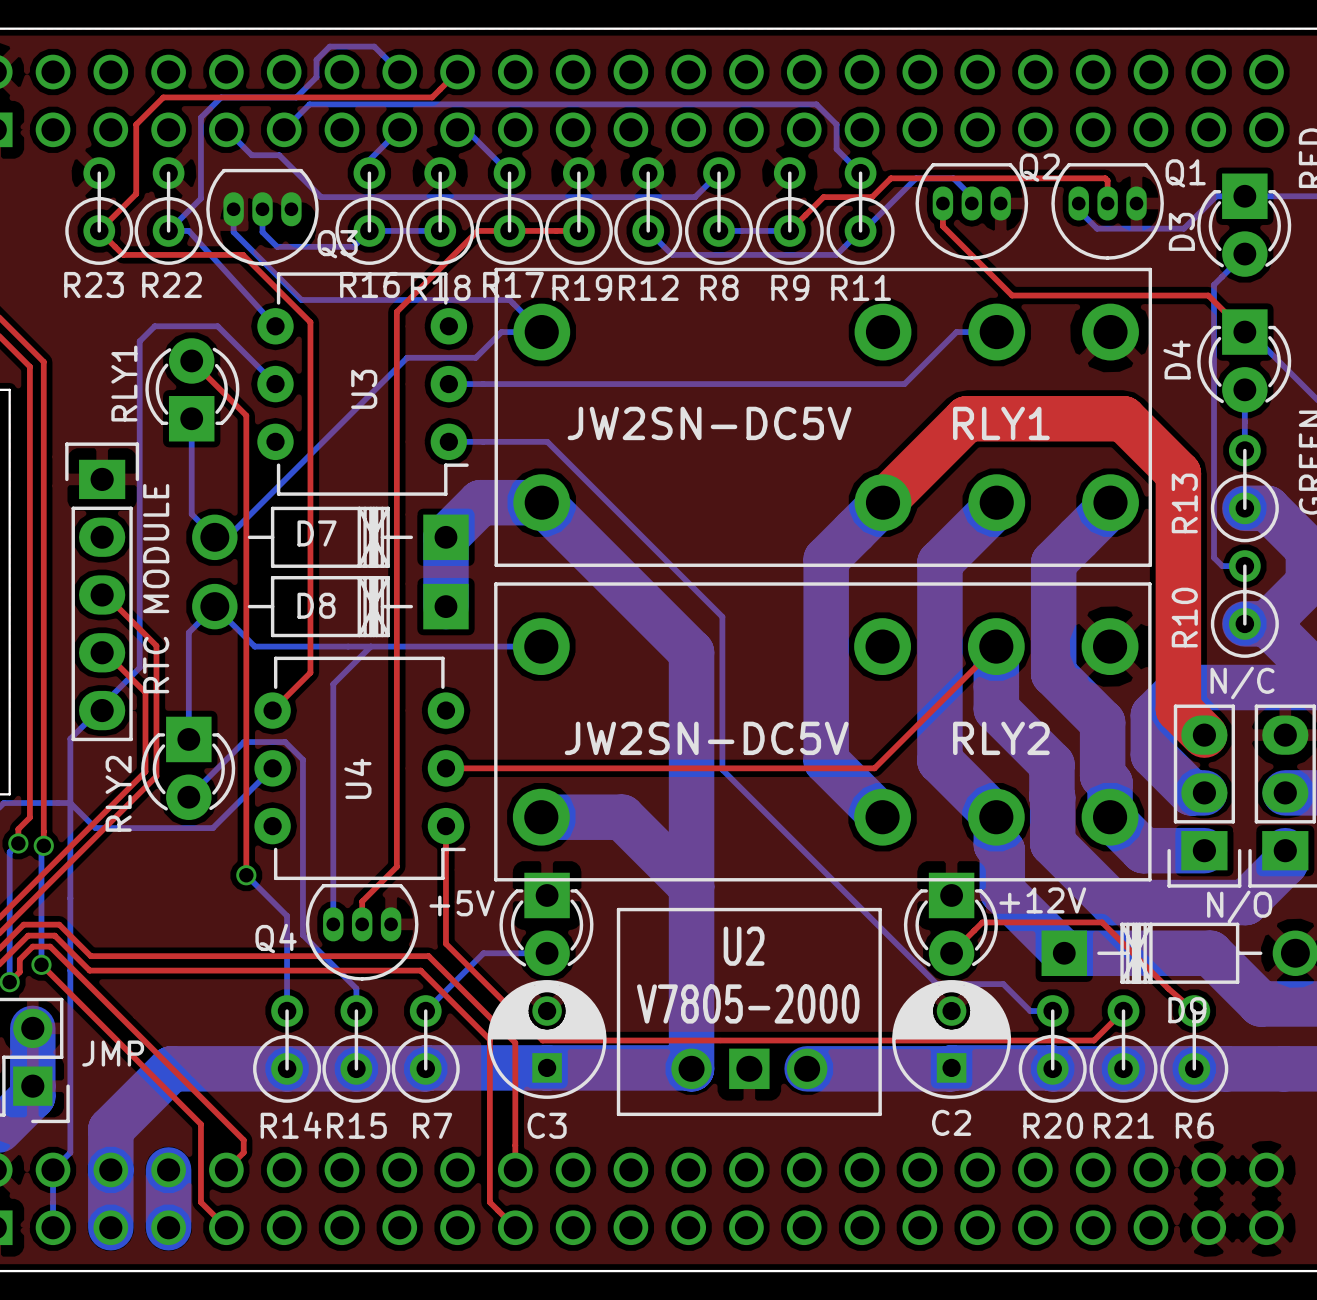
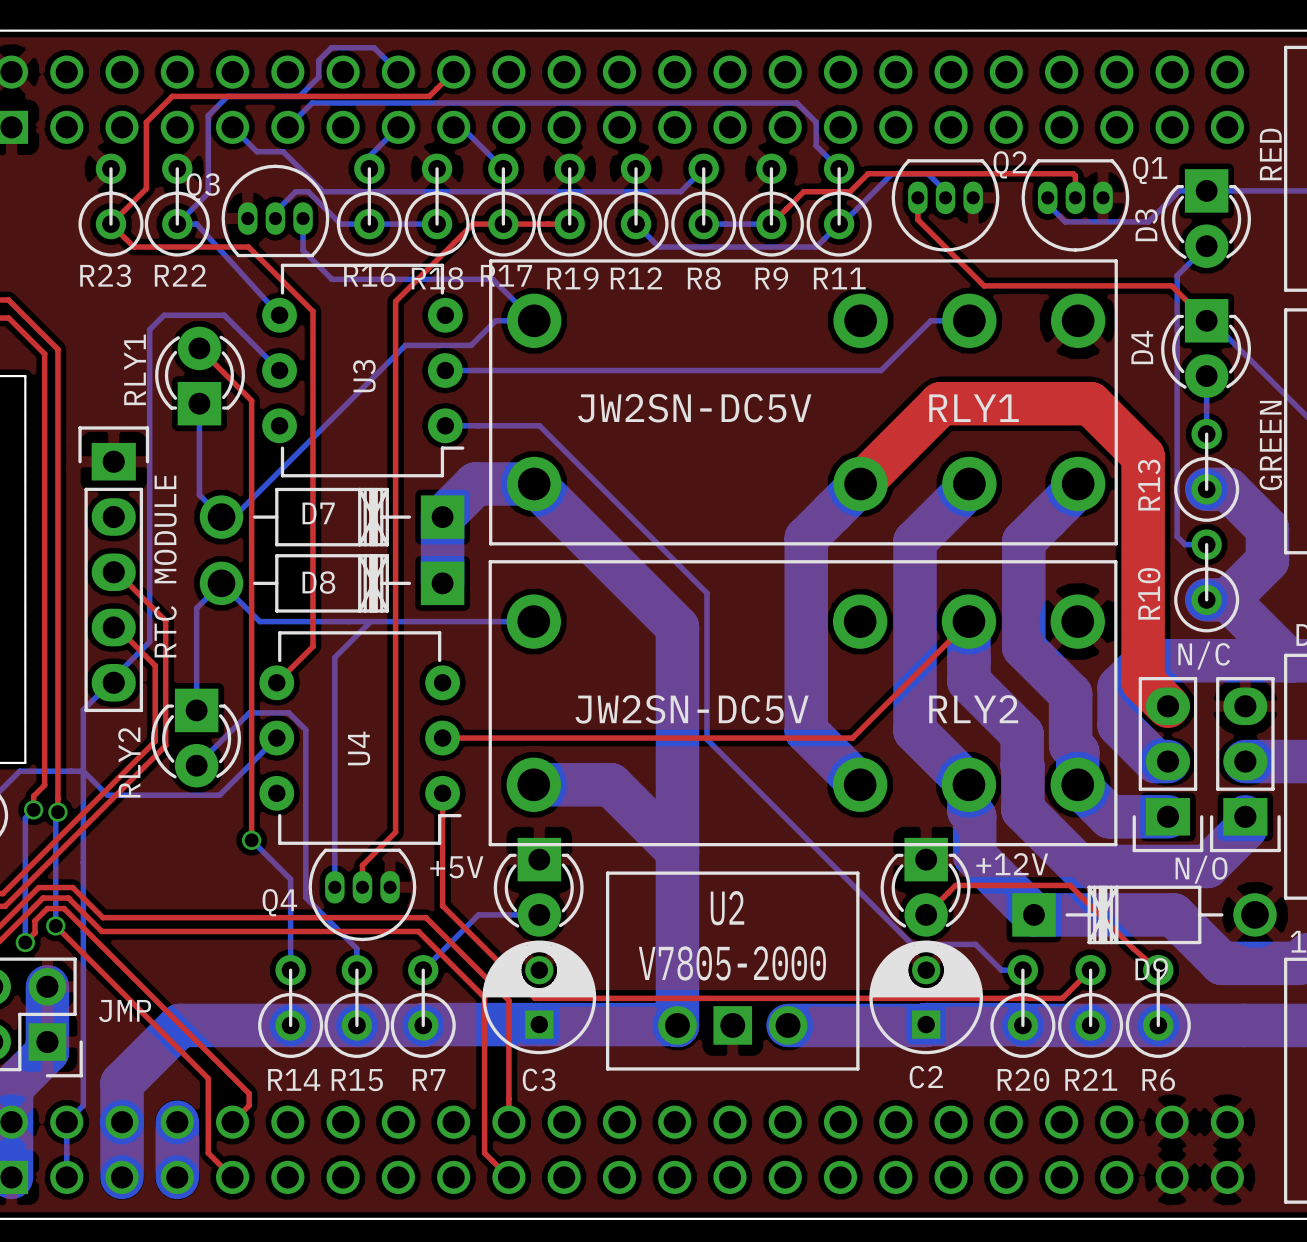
bottom track: (233, 209) (233, 232) (301, 299) (509, 299) -> (303, 218) (303, 250) (332, 279) (492, 279) (503, 290)
bottom track: (262, 209) (262, 232) (277, 246) (353, 246) (369, 230) -> (275, 218) (275, 212) (295, 191) (308, 191) (340, 224) (369, 224)
Q3 rotation: 0° (262, 217) -> 180° (275, 210)

